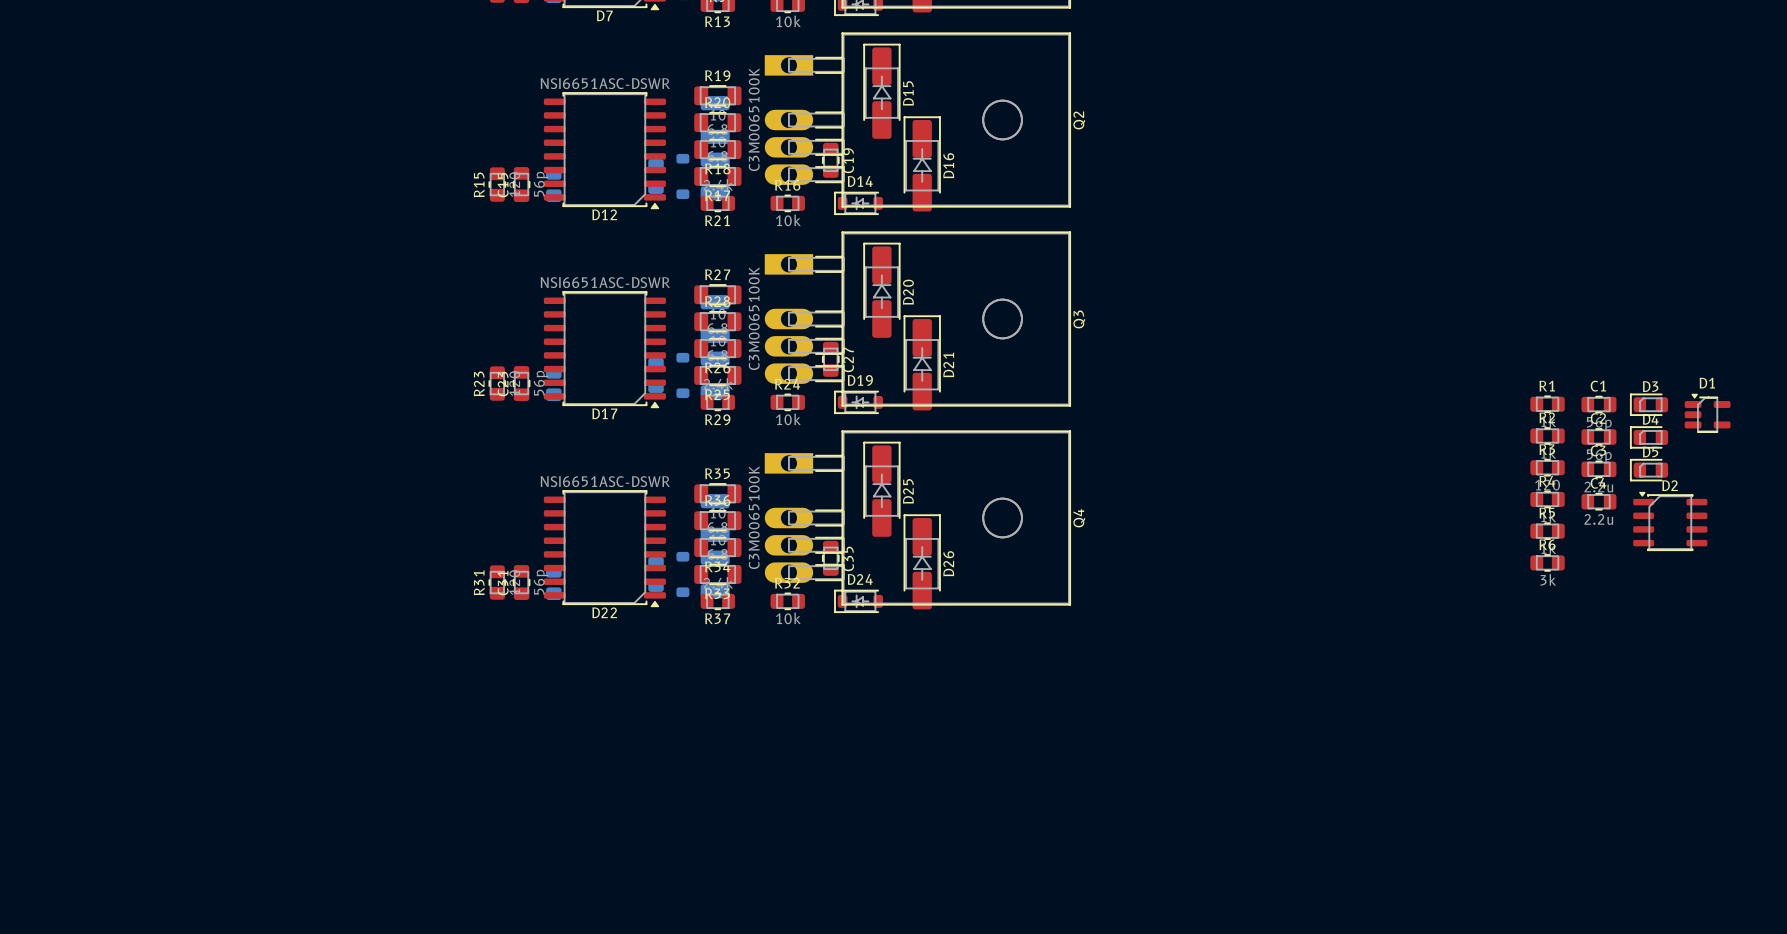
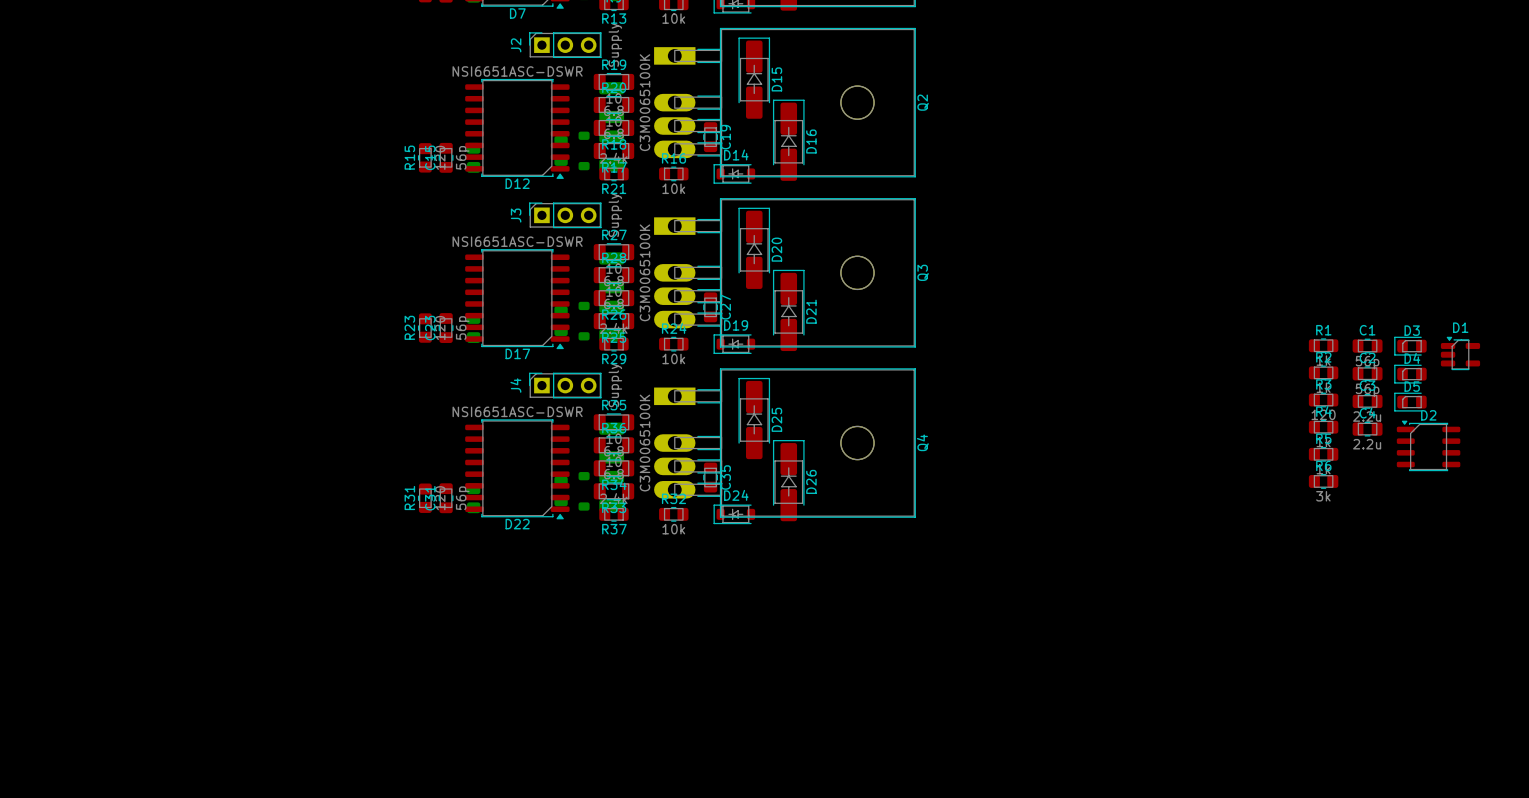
J2: none -> Supply (565, 45)
J3: none -> Supply (565, 215)
J4: none -> Supply (565, 385)

